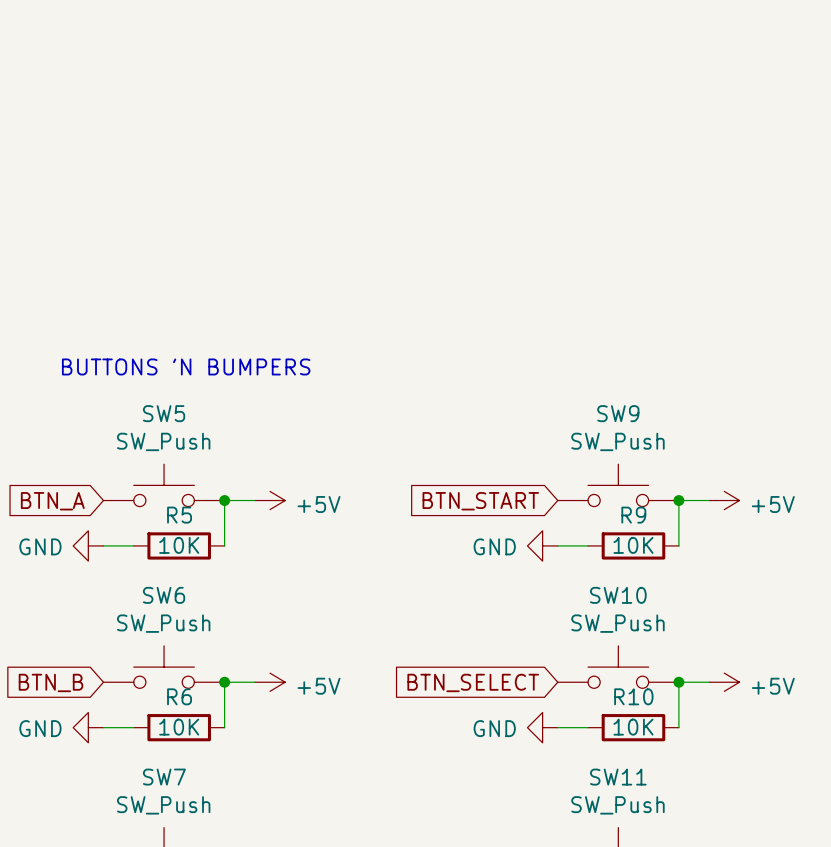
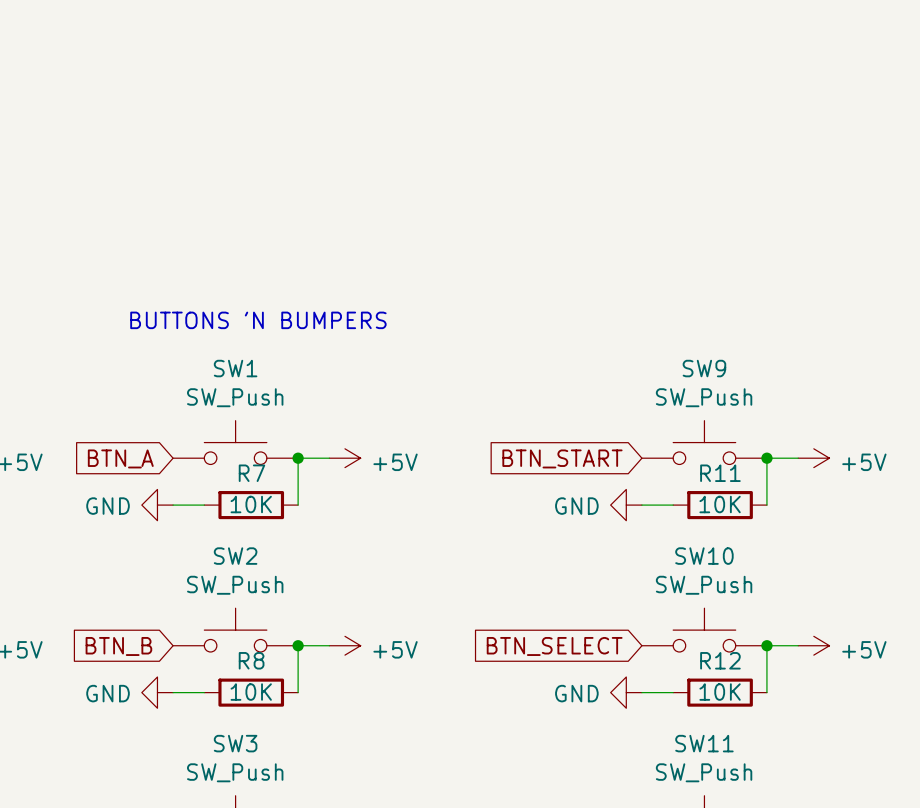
SW5 name: SW5 (164, 413) -> SW1 (235, 368)
R5 name: R5 (179, 515) -> R7 (251, 473)
R9 name: R9 (633, 515) -> R11 (720, 473)
SW6 name: SW6 (164, 595) -> SW2 (235, 556)
R6 name: R6 (179, 696) -> R8 (251, 660)
R10 name: R10 (633, 696) -> R12 (720, 660)
SW7 name: SW7 (164, 777) -> SW3 (235, 743)

